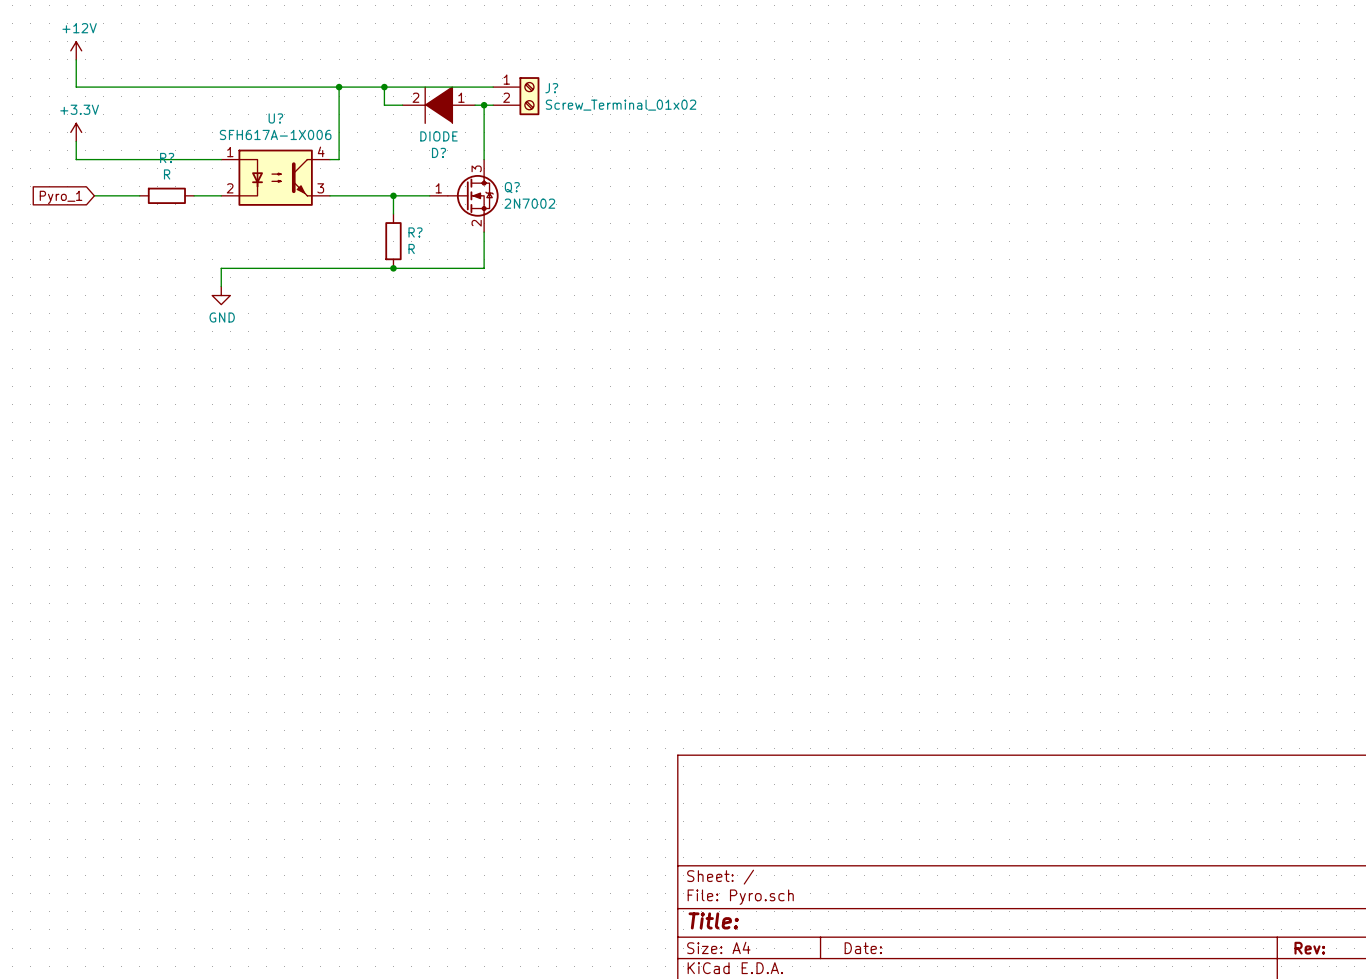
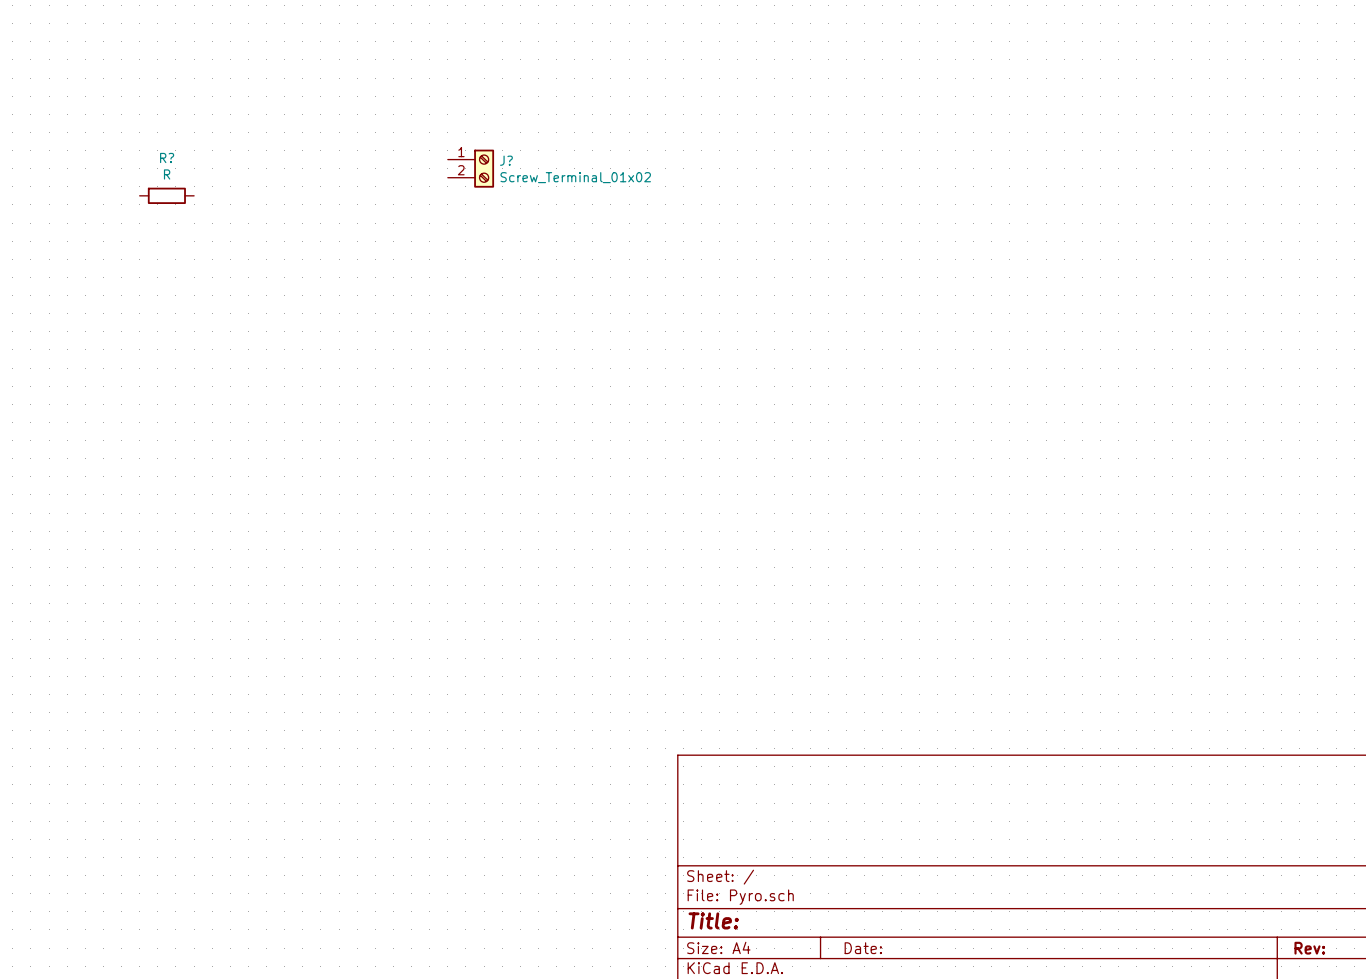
power symbol: +12V (76, 50) -> none
wire: (76, 59) (76, 87) (493, 87) -> none
wire: (339, 87) (339, 159) (330, 159) -> none
junction: (339, 87) -> none
wire: (384, 87) (384, 105) (402, 105) -> none
junction: (384, 87) -> none
J? position: (516, 96) -> (470, 168)
D?: DIODE (438, 105) -> none
wire: (475, 105) (493, 105) -> none
wire: (484, 105) (484, 159) -> none
junction: (484, 105) -> none
power symbol: +3.3V (76, 132) -> none
wire: (76, 141) (76, 159) (221, 159) -> none
U?: SFH617A-1X006 (275, 177) -> none
wire: (94, 195) (139, 195) -> none
wire: (194, 195) (221, 195) -> none
wire: (330, 195) (429, 195) -> none
wire: (393, 195) (393, 213) -> none
junction: (393, 195) -> none
Q?: 2N7002 (464, 195) -> none
global label: Pyro_1 (61, 197) -> none
wire: (484, 232) (484, 268) (221, 268) (221, 286) -> none
R?: R (393, 241) -> none
junction: (393, 268) -> none
power symbol: GND (221, 295) -> none

